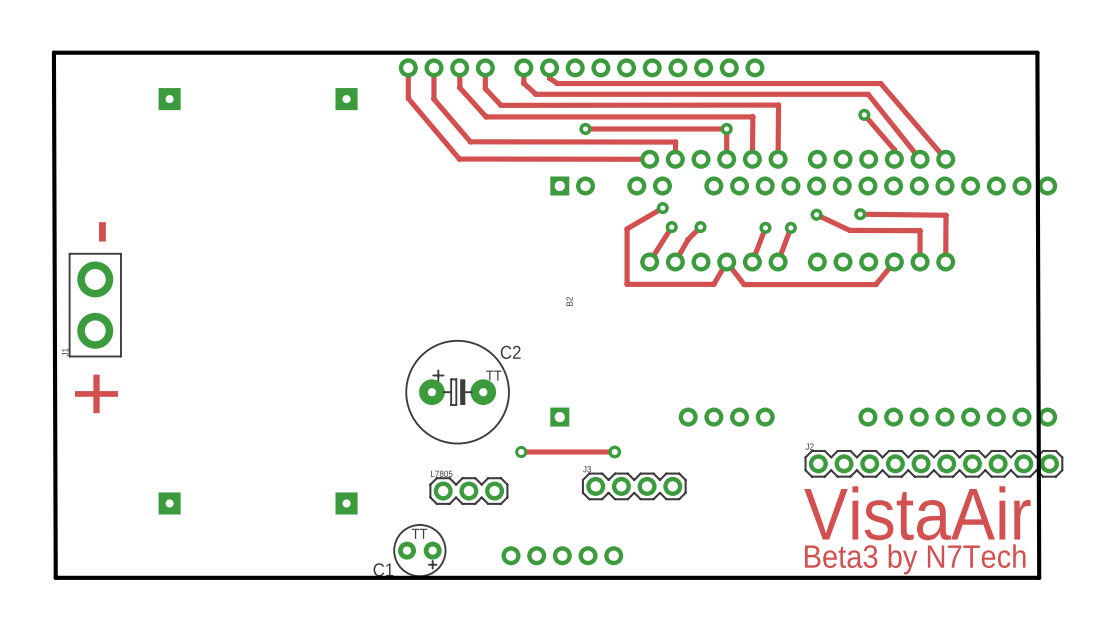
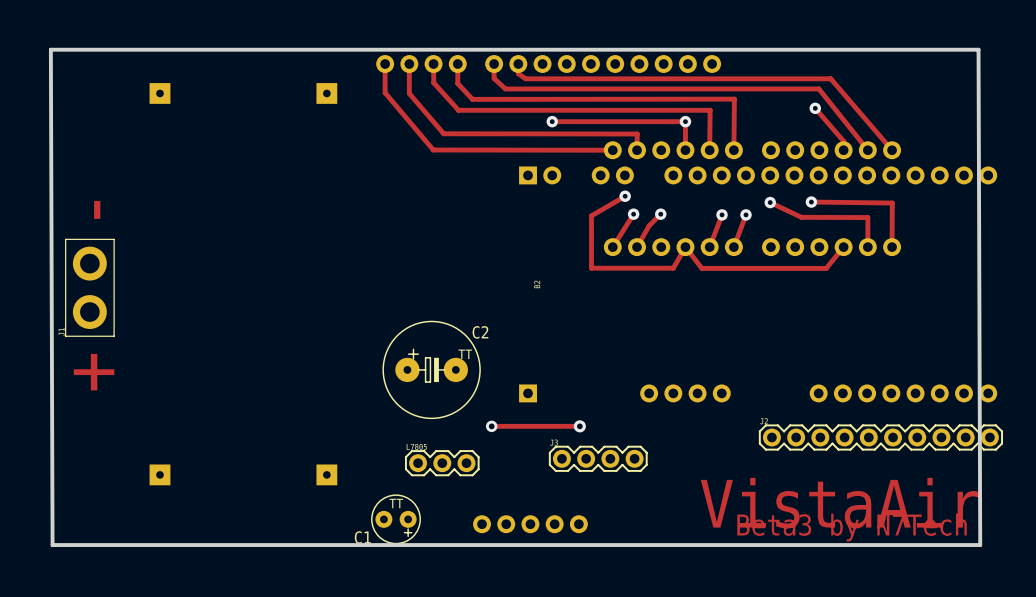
text position: VistaAir (917, 513) -> VistaAir (840, 503)

